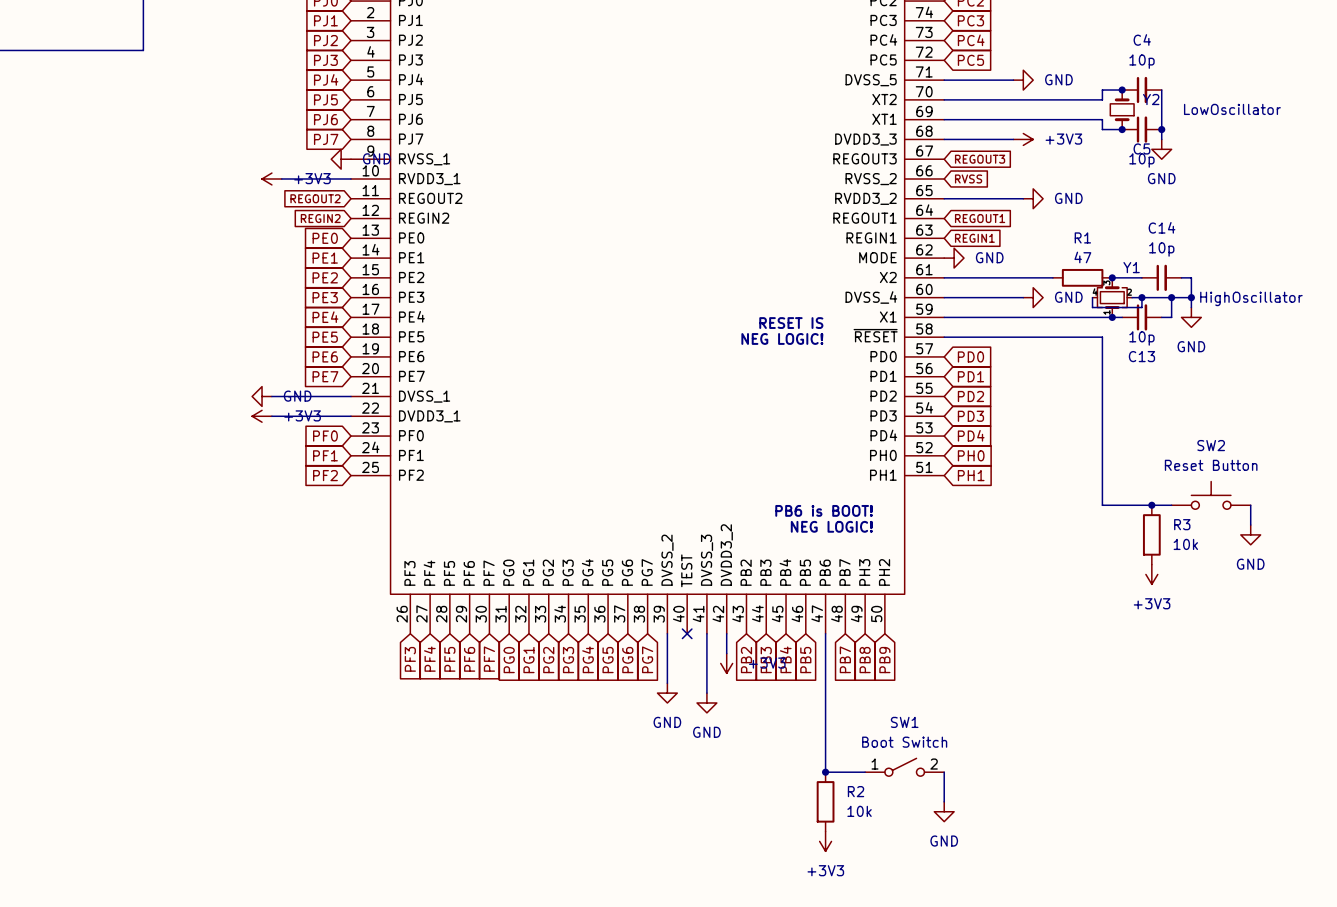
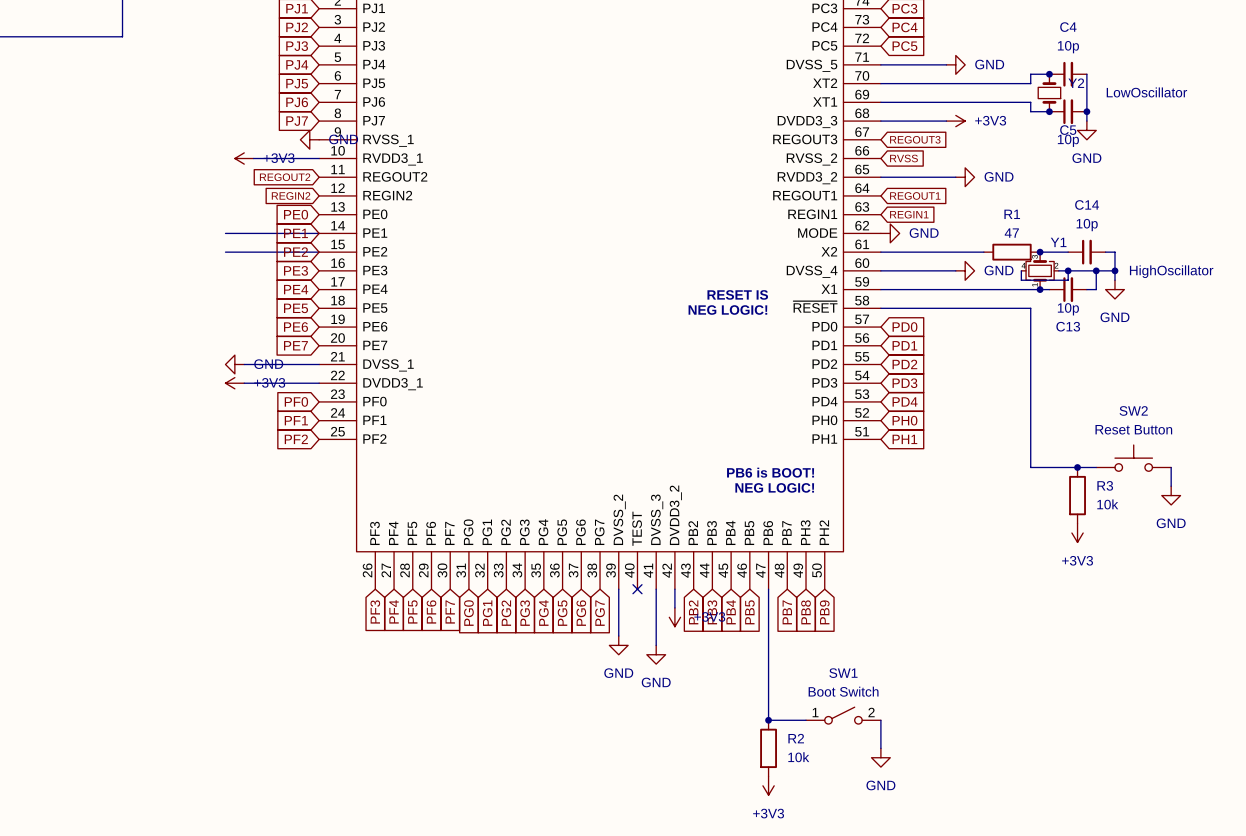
wire: none -> (225, 233) (319, 233)
wire: none -> (225, 252) (319, 252)

